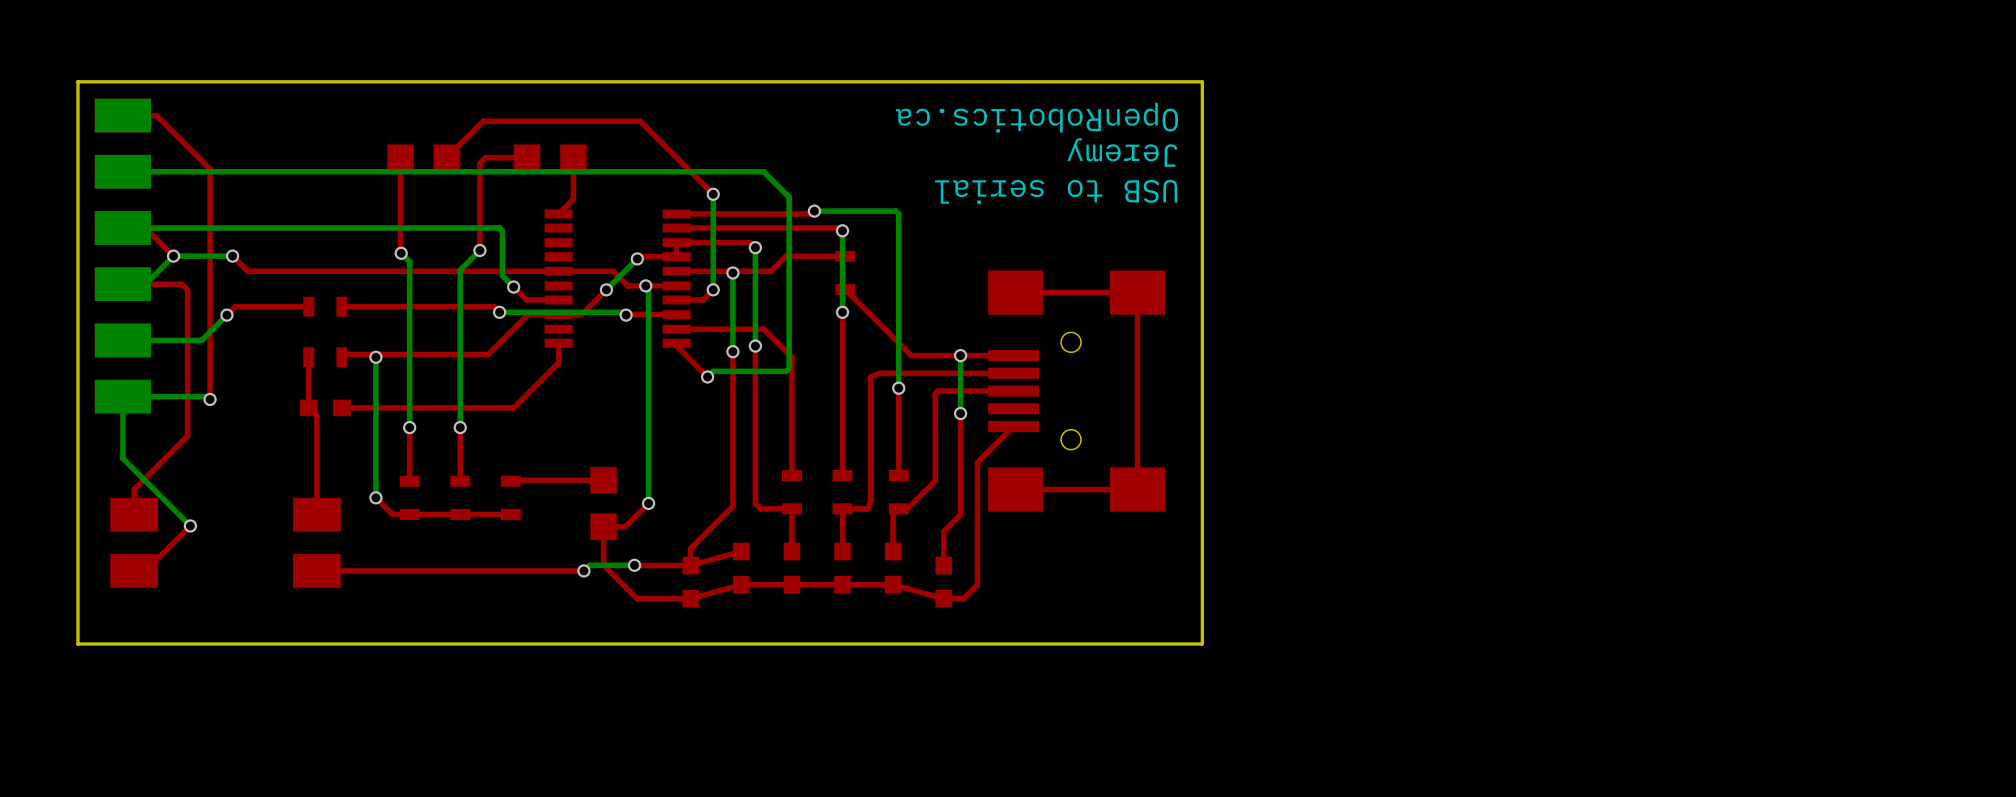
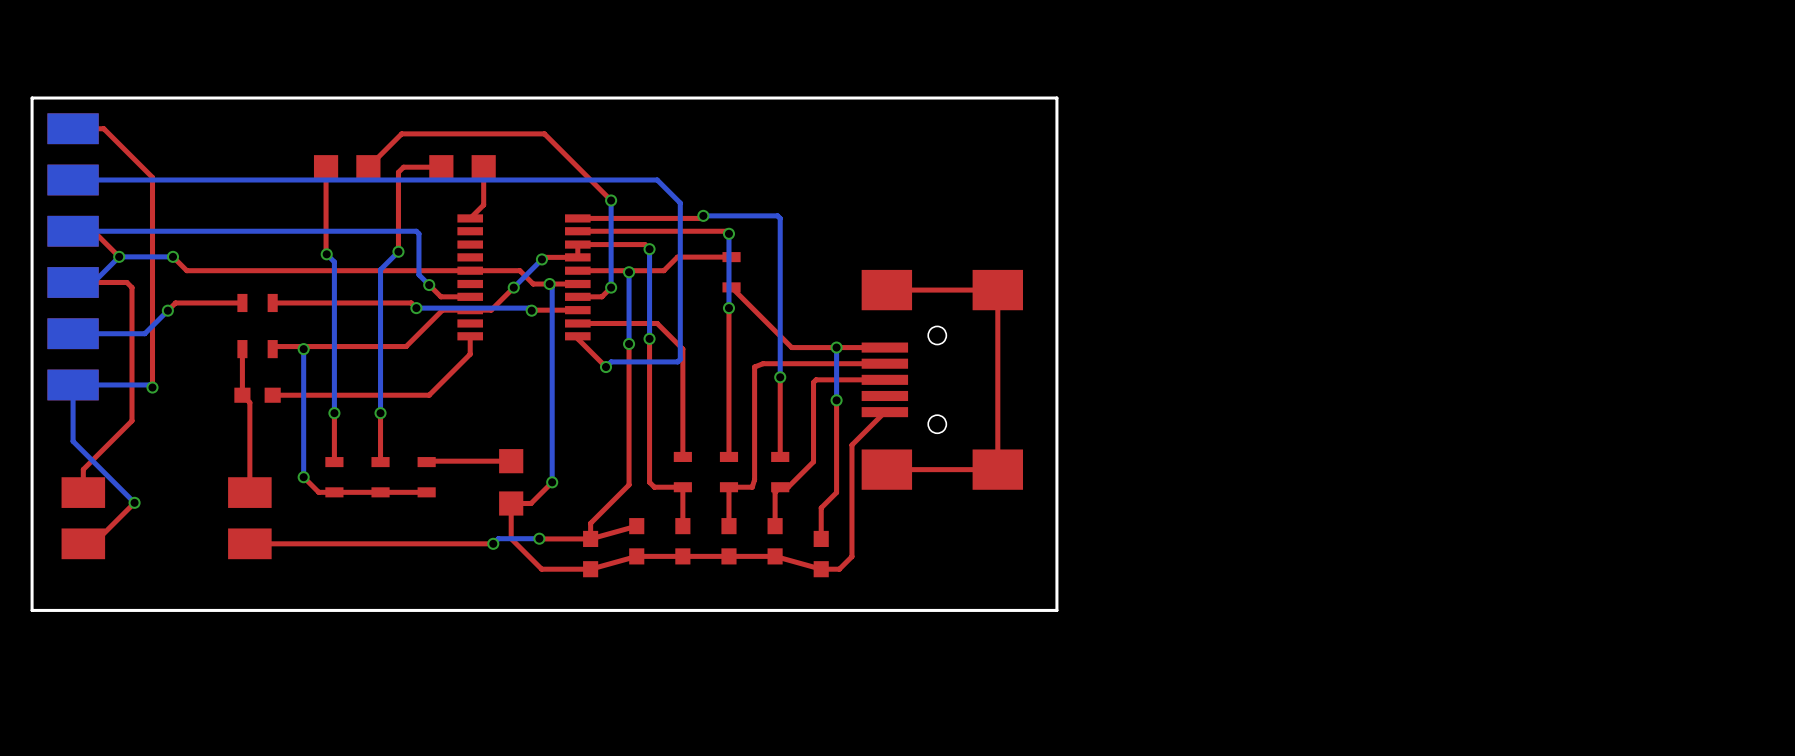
text: OpenRobotics.ca (1037, 117) -> none
text: Jeremy (1122, 152) -> none
text: USB to serial (1056, 191) -> none

